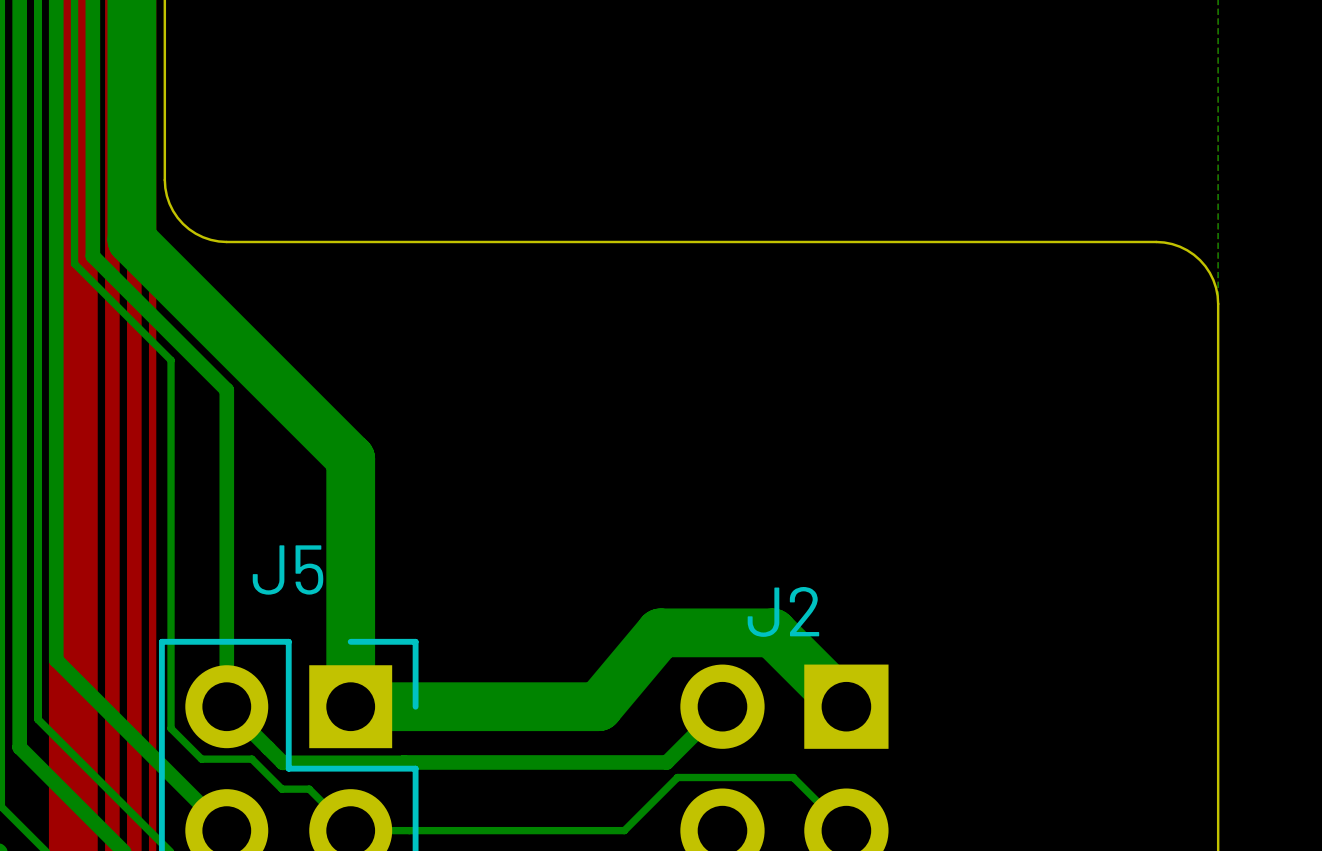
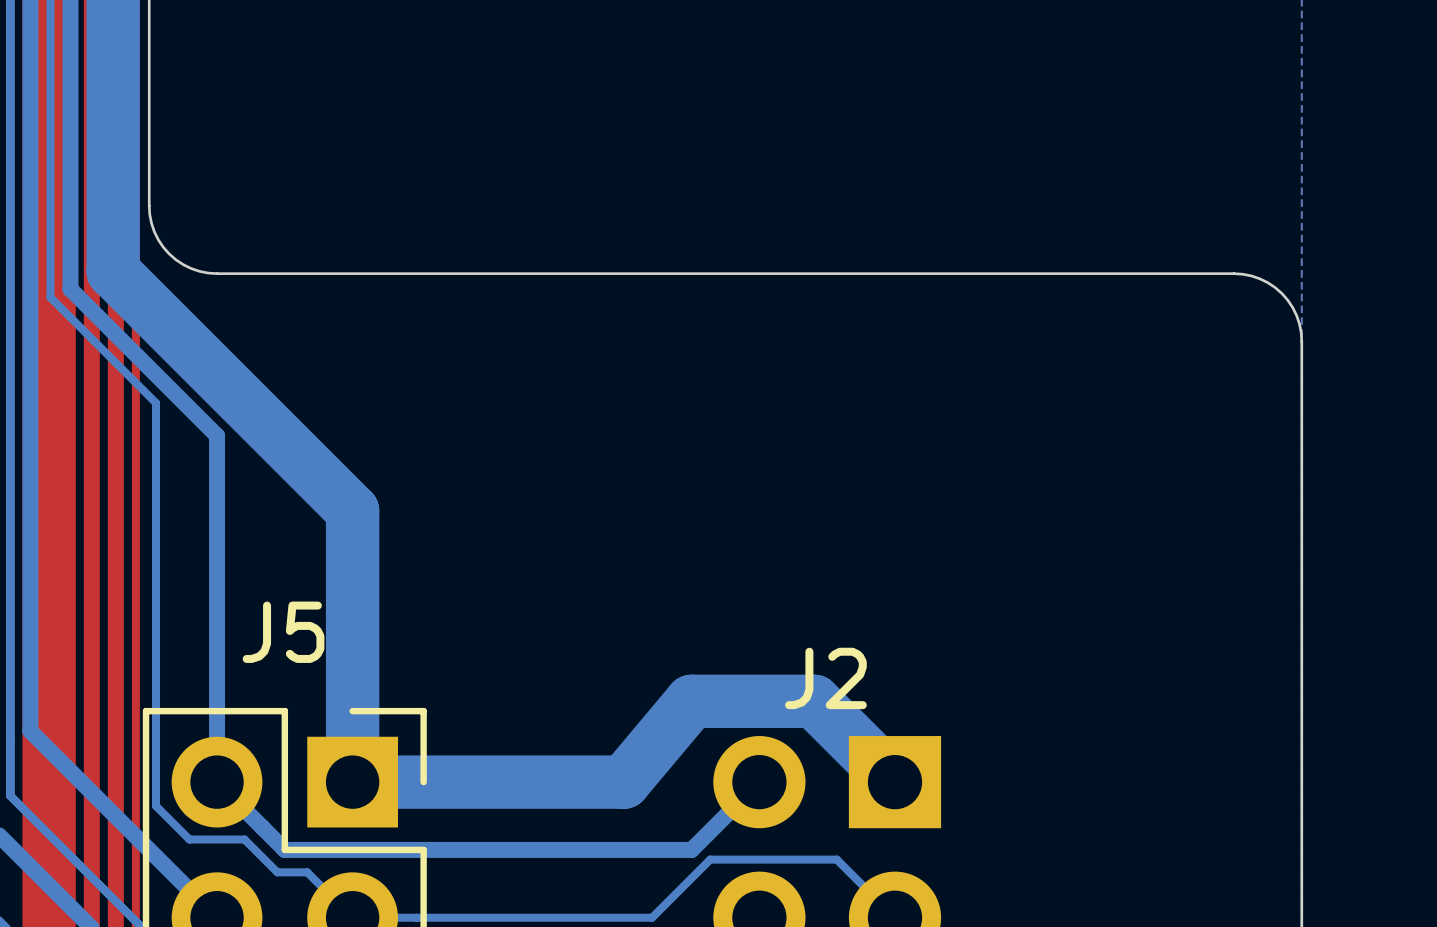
bottom track: (403, 762) (282, 762) -> none
bottom track: (666, 762) (404, 762) -> (698, 843) (691, 849) (284, 849) (278, 843)

